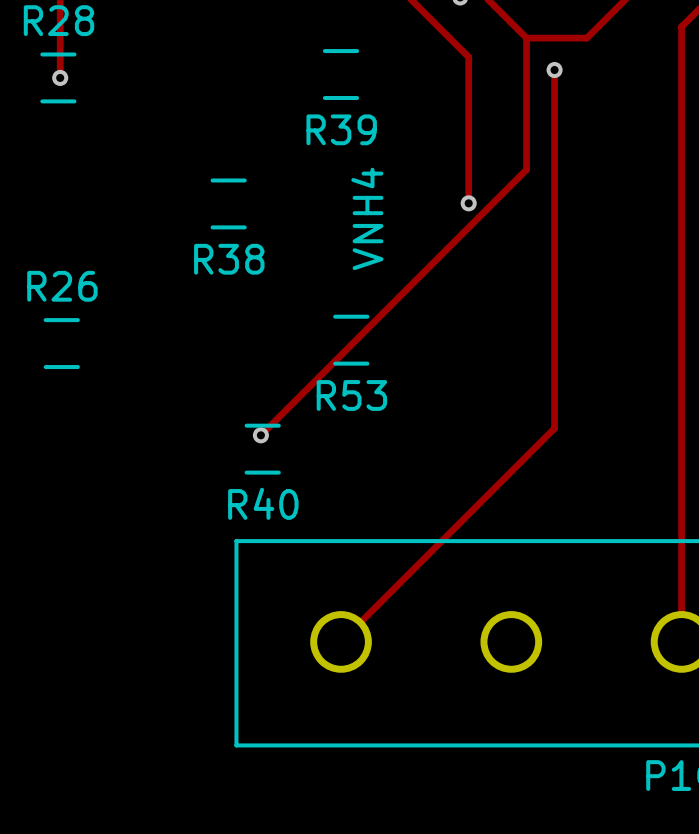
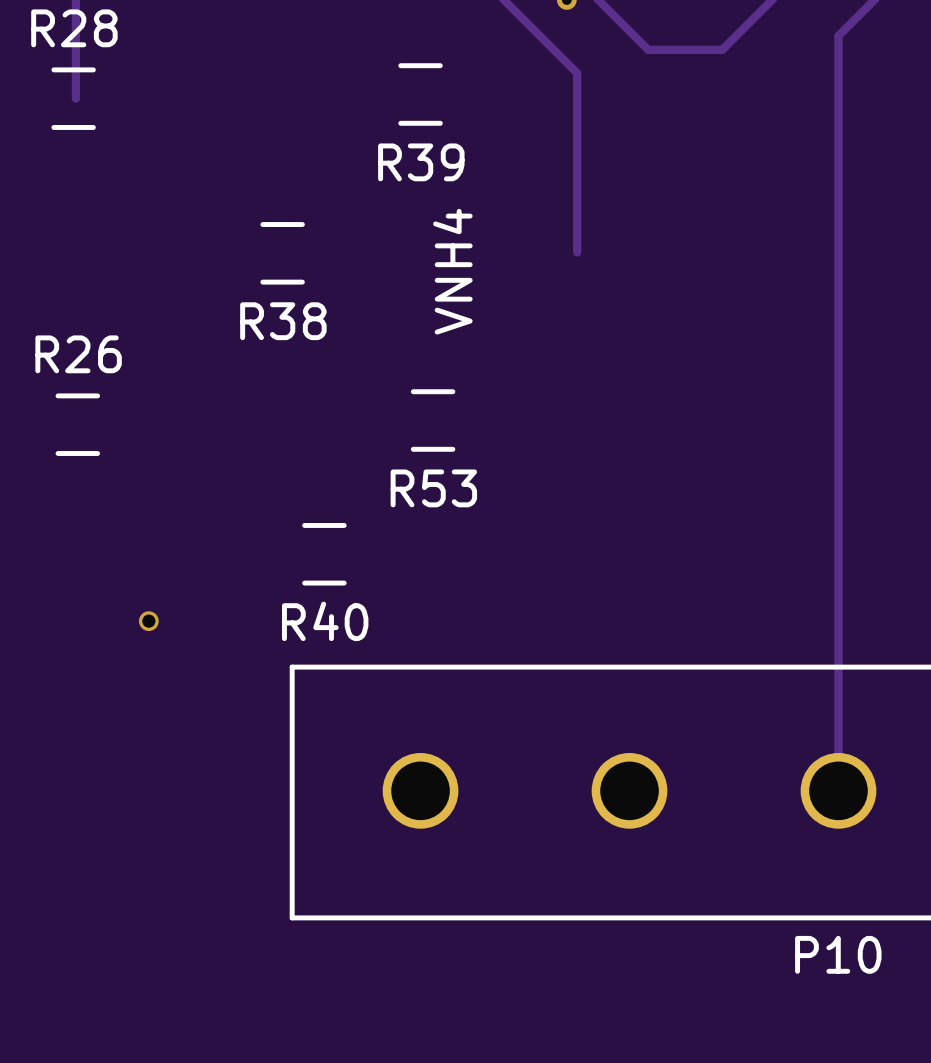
track: (526, 38) (526, 169) (260, 435) -> none
track: (554, 70) (554, 428) (341, 641) -> none
via: (554, 70) -> none
via: (60, 77) -> none
via: (468, 203) -> none
via: (260, 435) -> none
via: none -> (148, 621)

